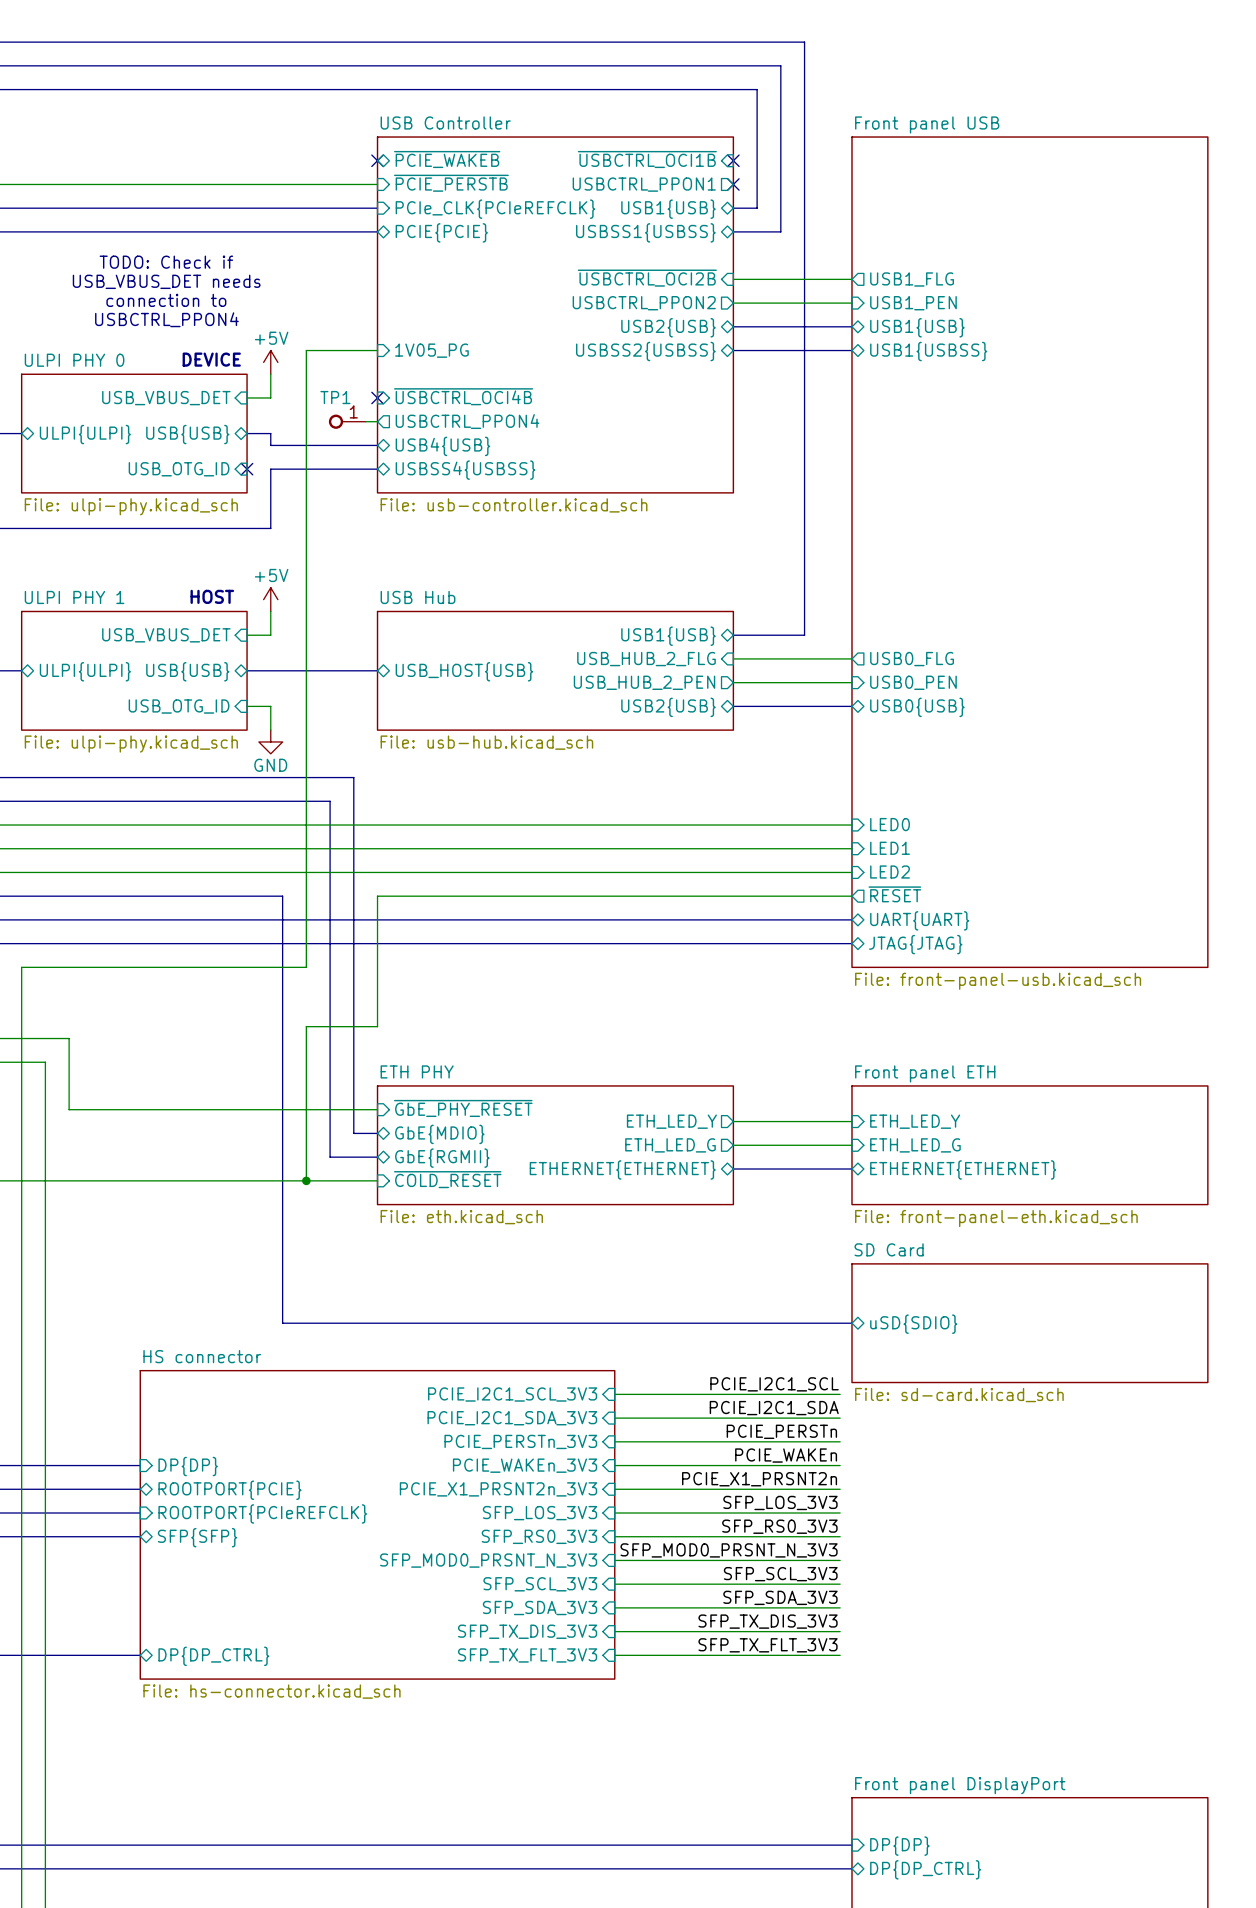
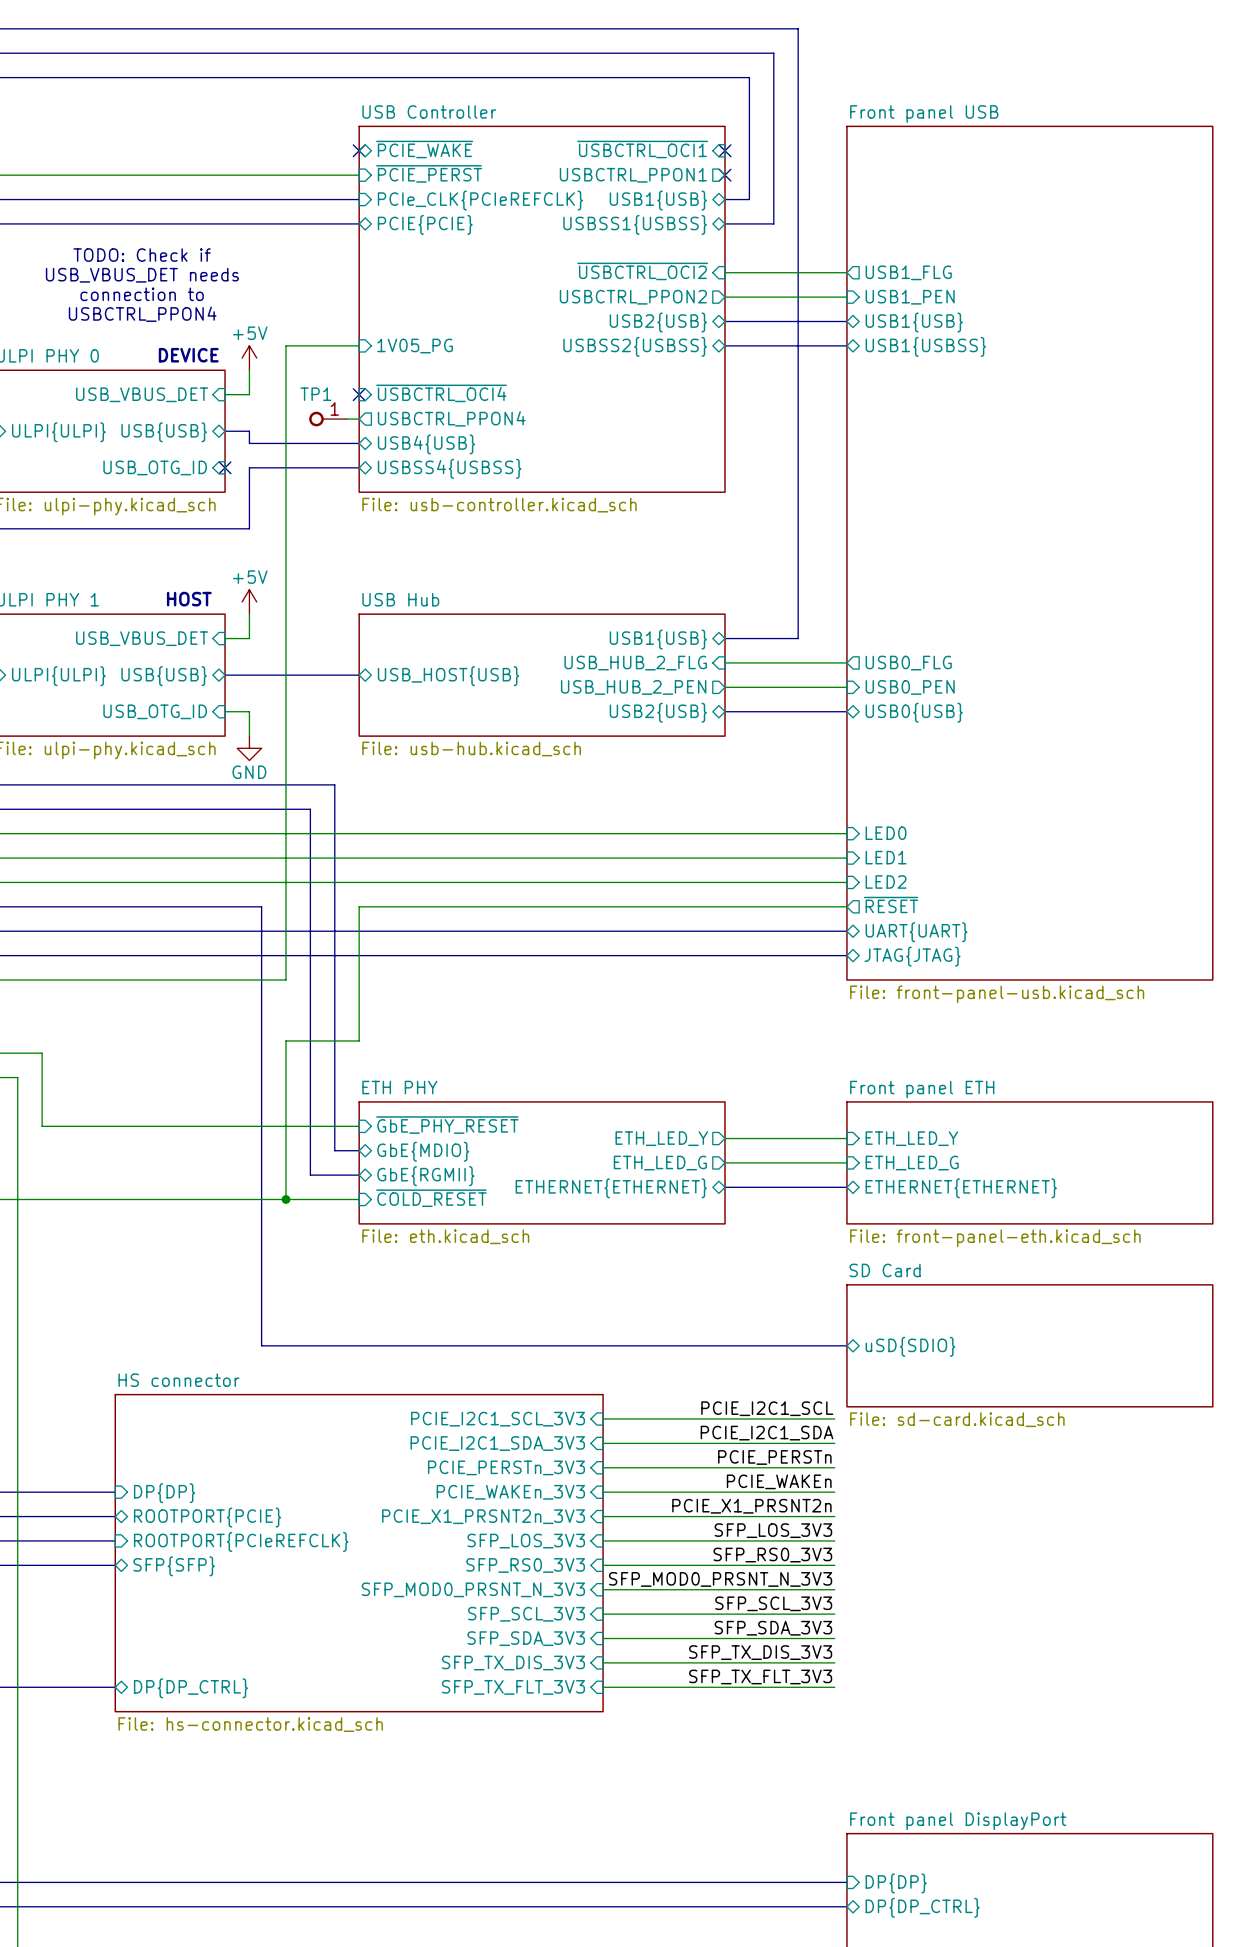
sheet pin: ~{PCIE_WAKEB} (447, 159) -> ~{PCIE_WAKE} (424, 149)
sheet pin: ~{USBCTRL_OCI1B} (647, 159) -> ~{USBCTRL_OCI1} (642, 149)
sheet pin: ~{PCIE_PERSTB} (451, 183) -> ~{PCIE_PERST} (429, 173)
sheet pin: ~{USBCTRL_OCI2B} (647, 278) -> ~{USBCTRL_OCI2} (642, 271)
sheet pin: ~{USBCTRL_OCI4B} (463, 396) -> ~{USBCTRL_OCI4} (441, 393)

